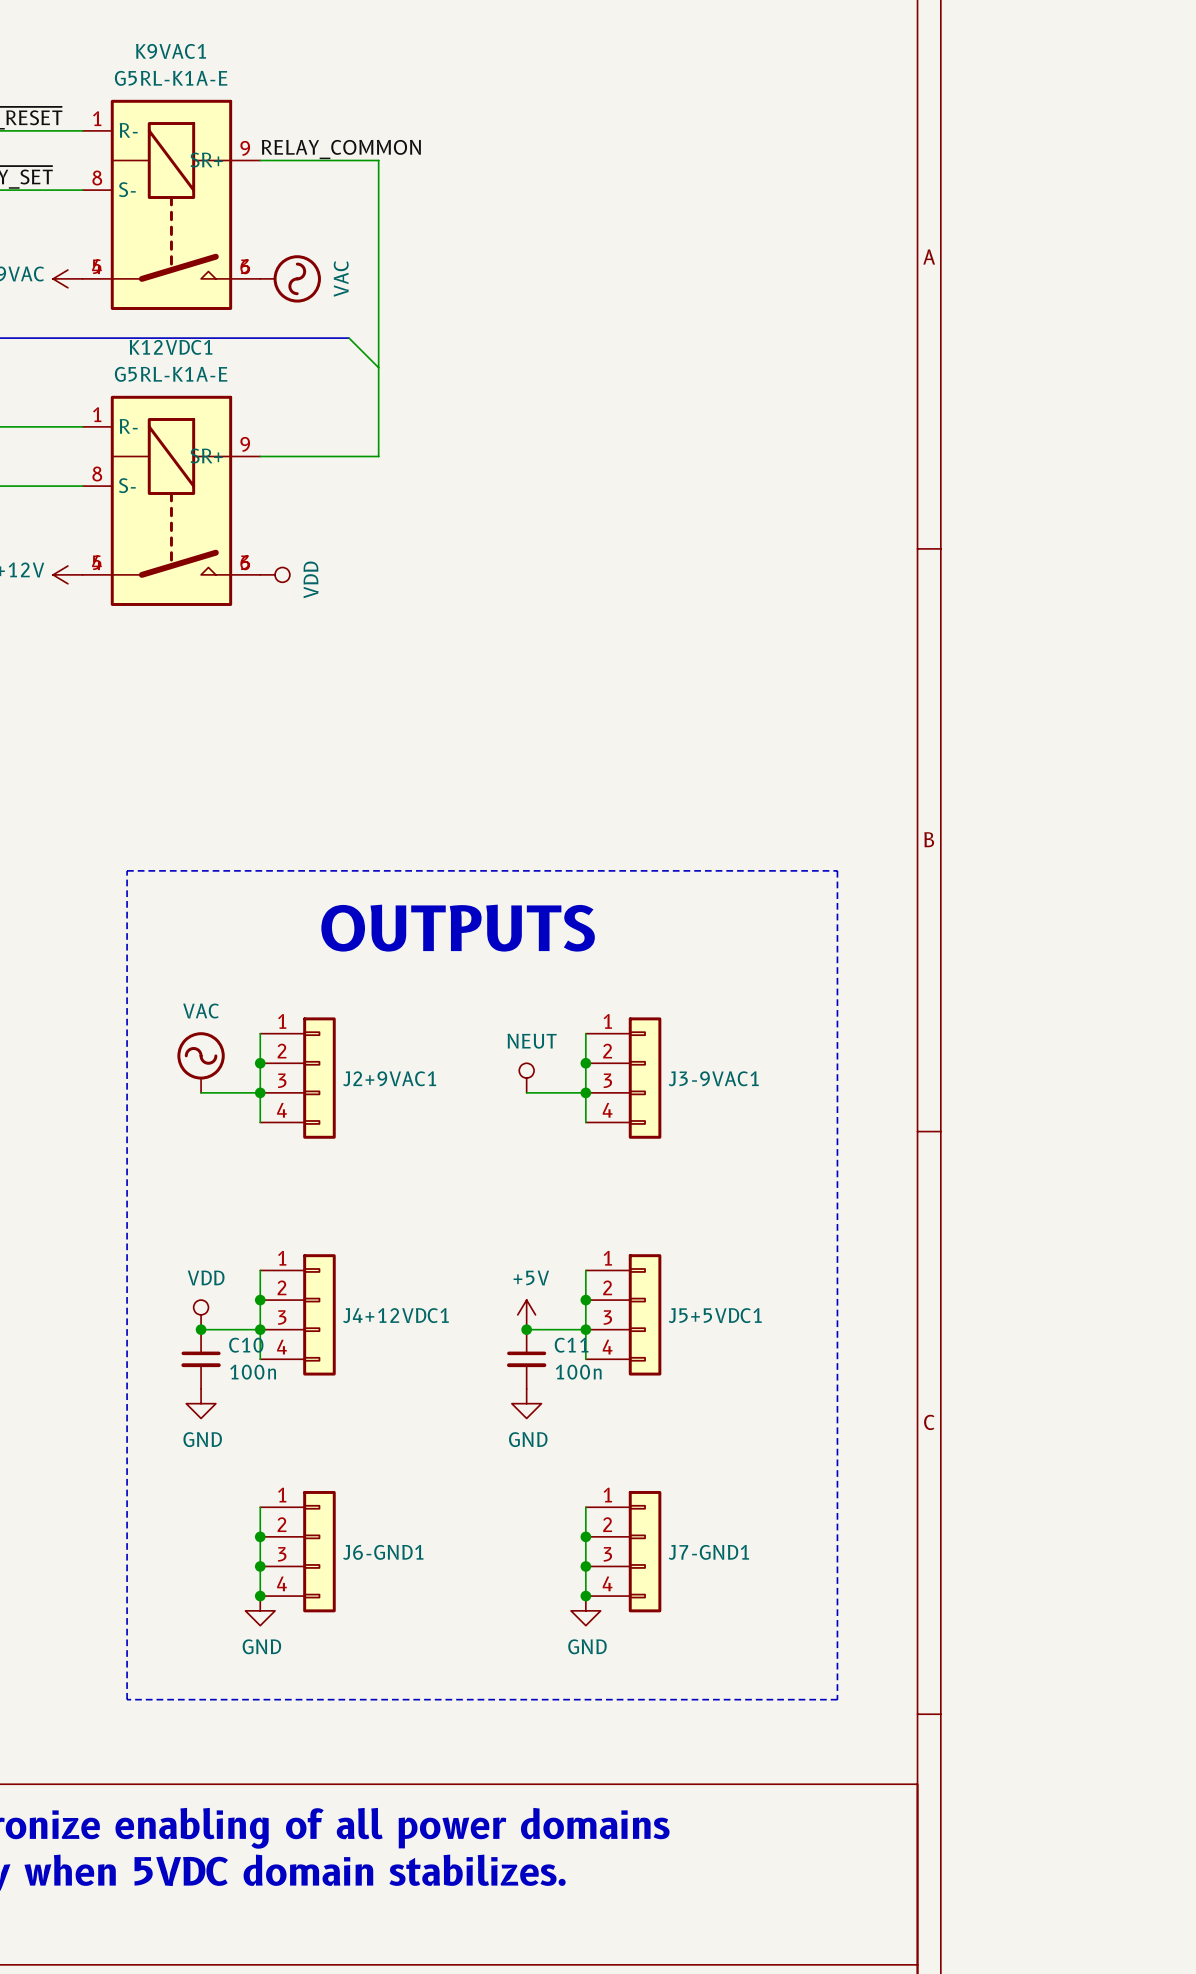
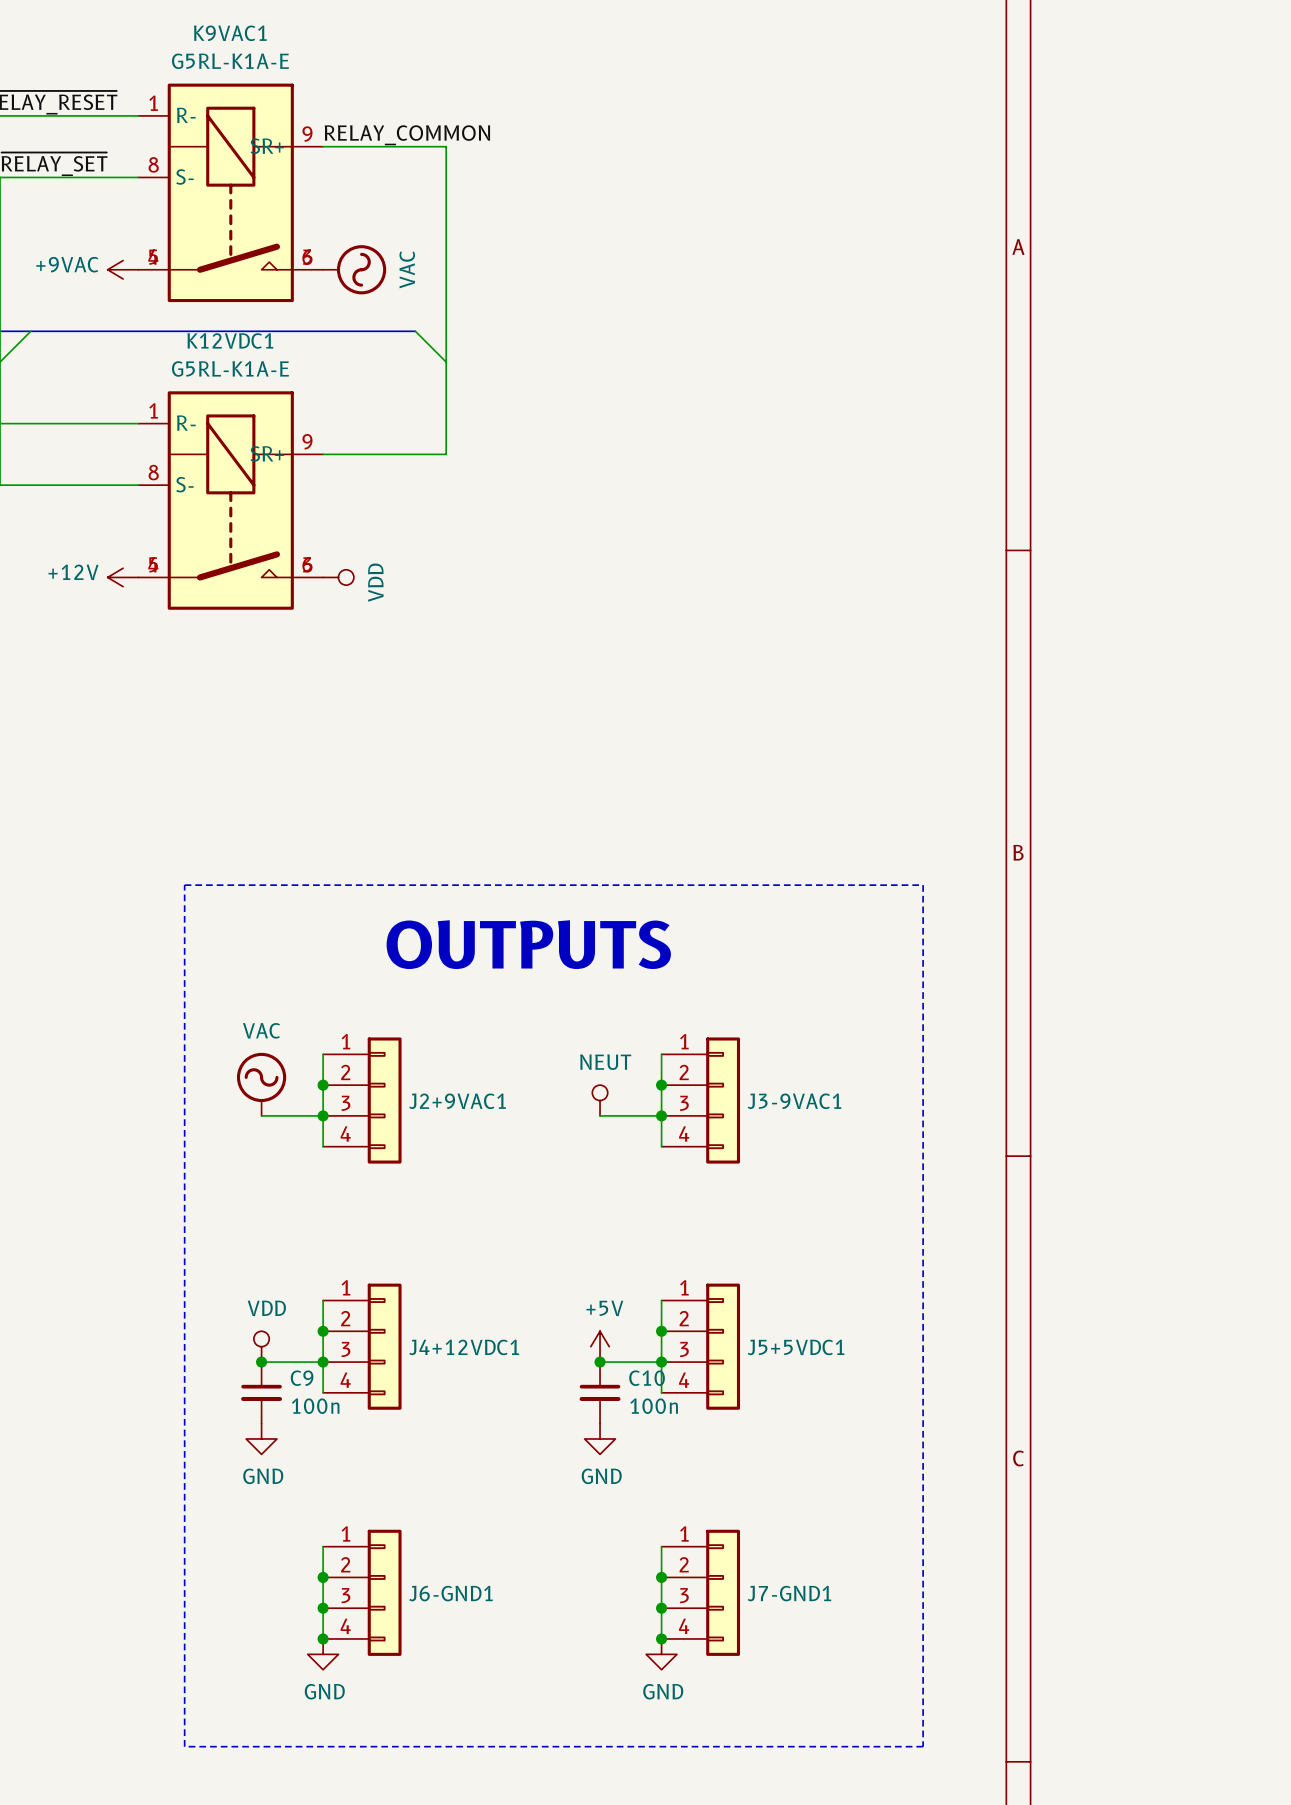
C10 name: C10 (246, 1345) -> C9 (302, 1378)
C11 name: C11 (571, 1345) -> C10 (647, 1378)

